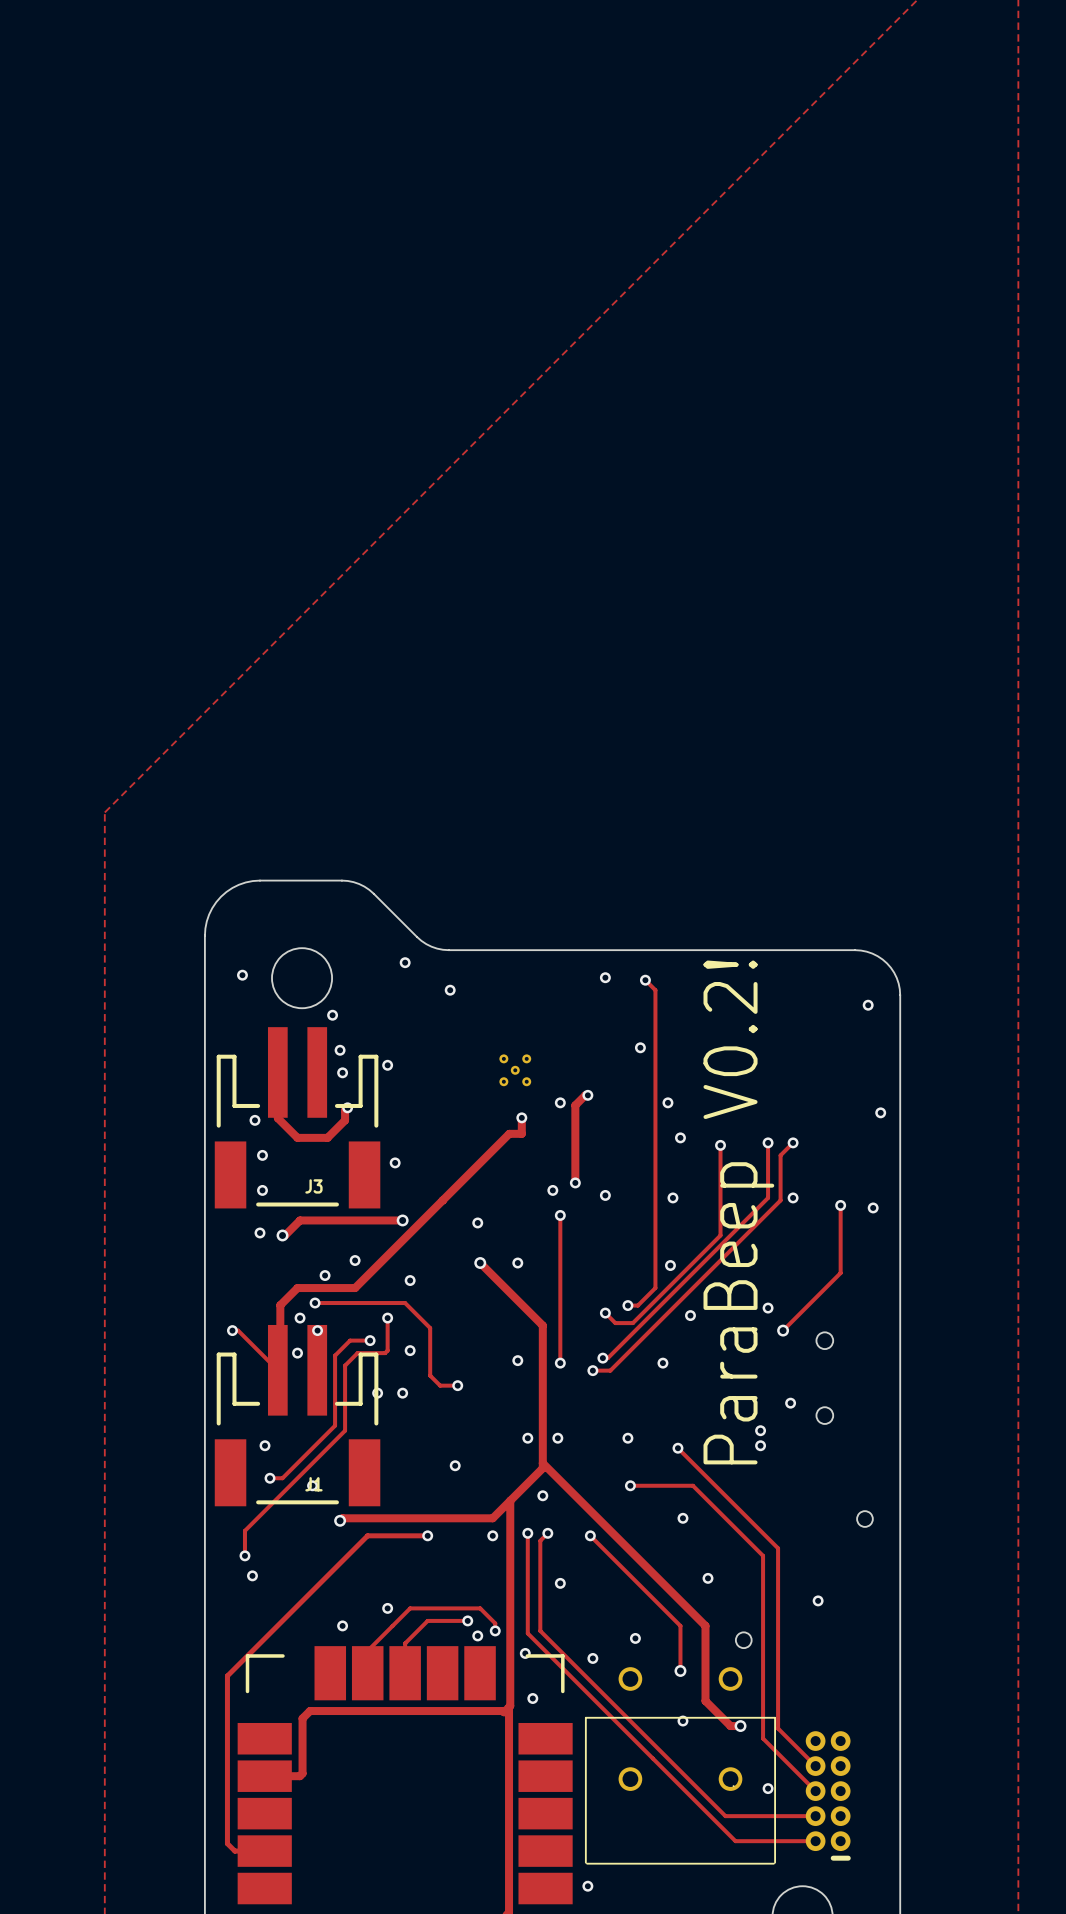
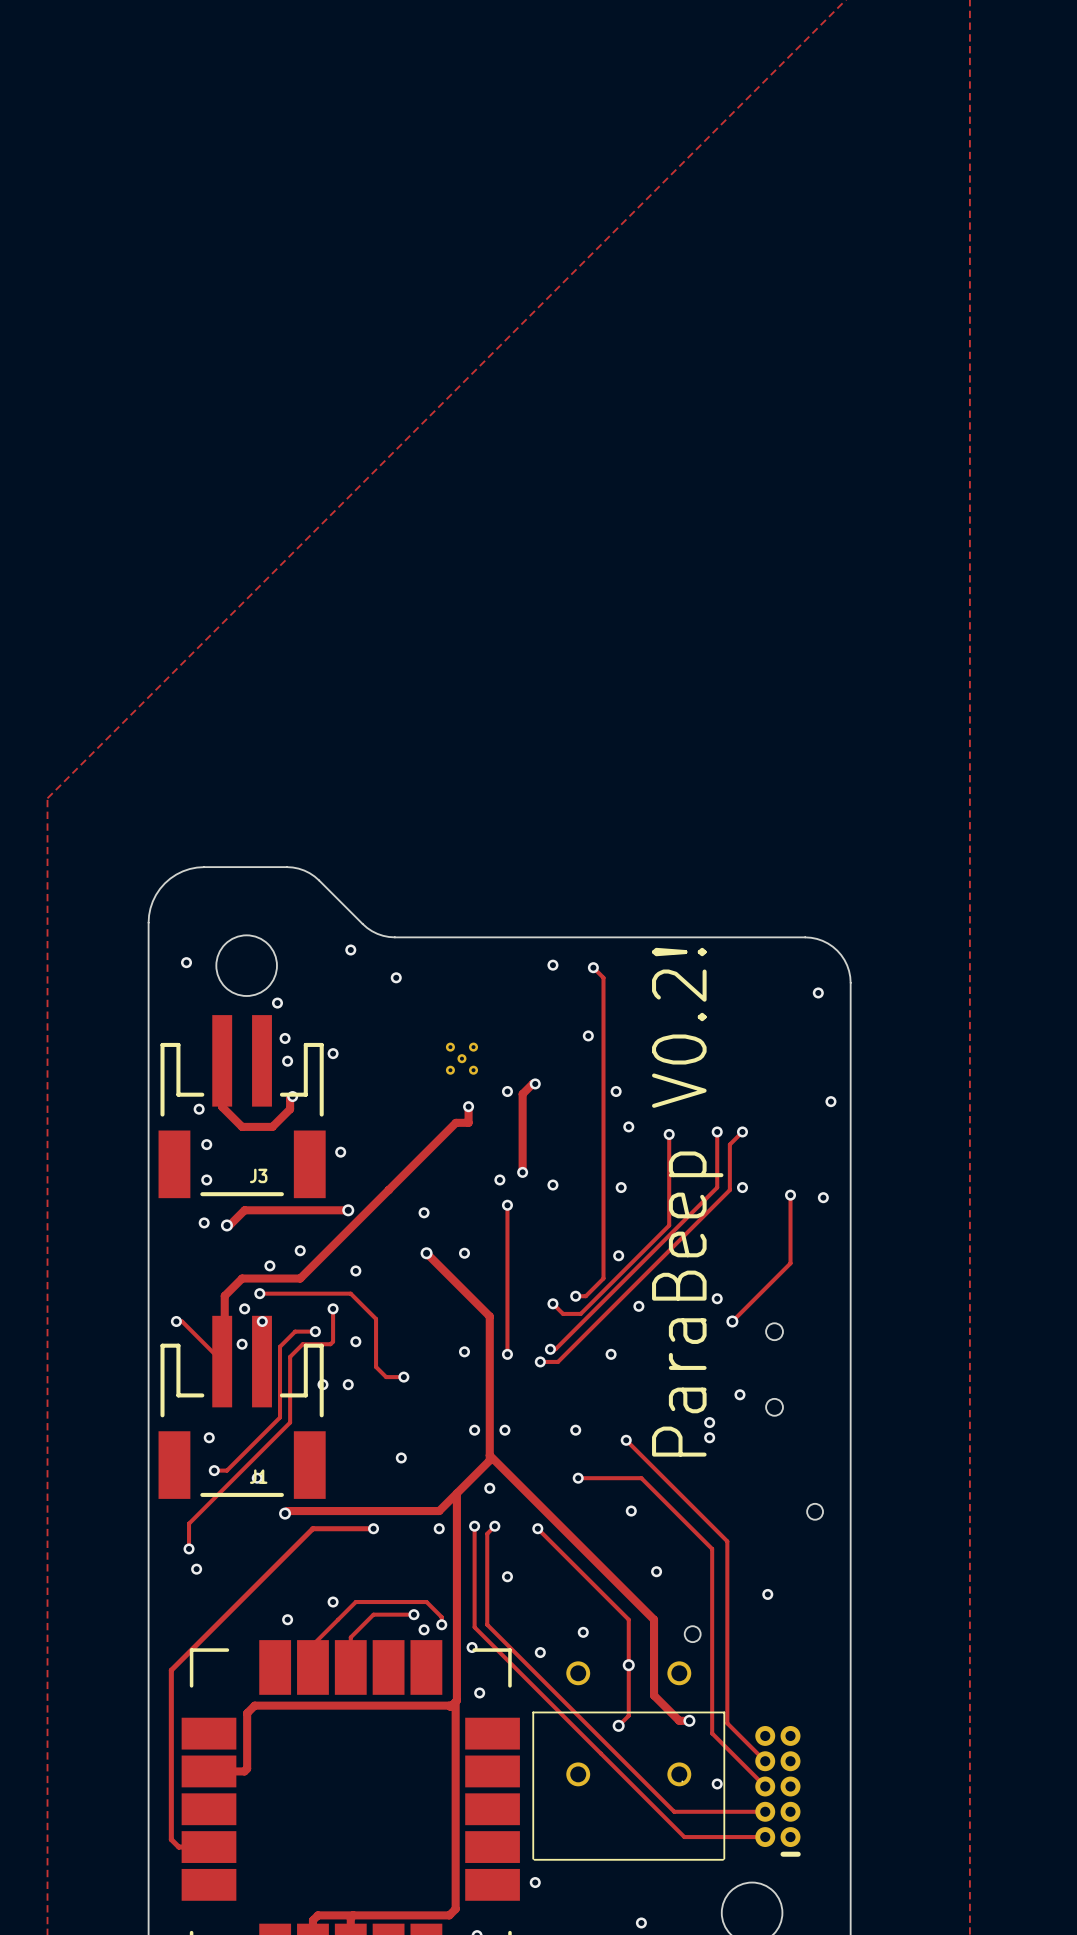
track: none -> (628, 1665) (628, 1715) (618, 1725)
via: (682, 1721) -> none
via: none -> (618, 1725)

